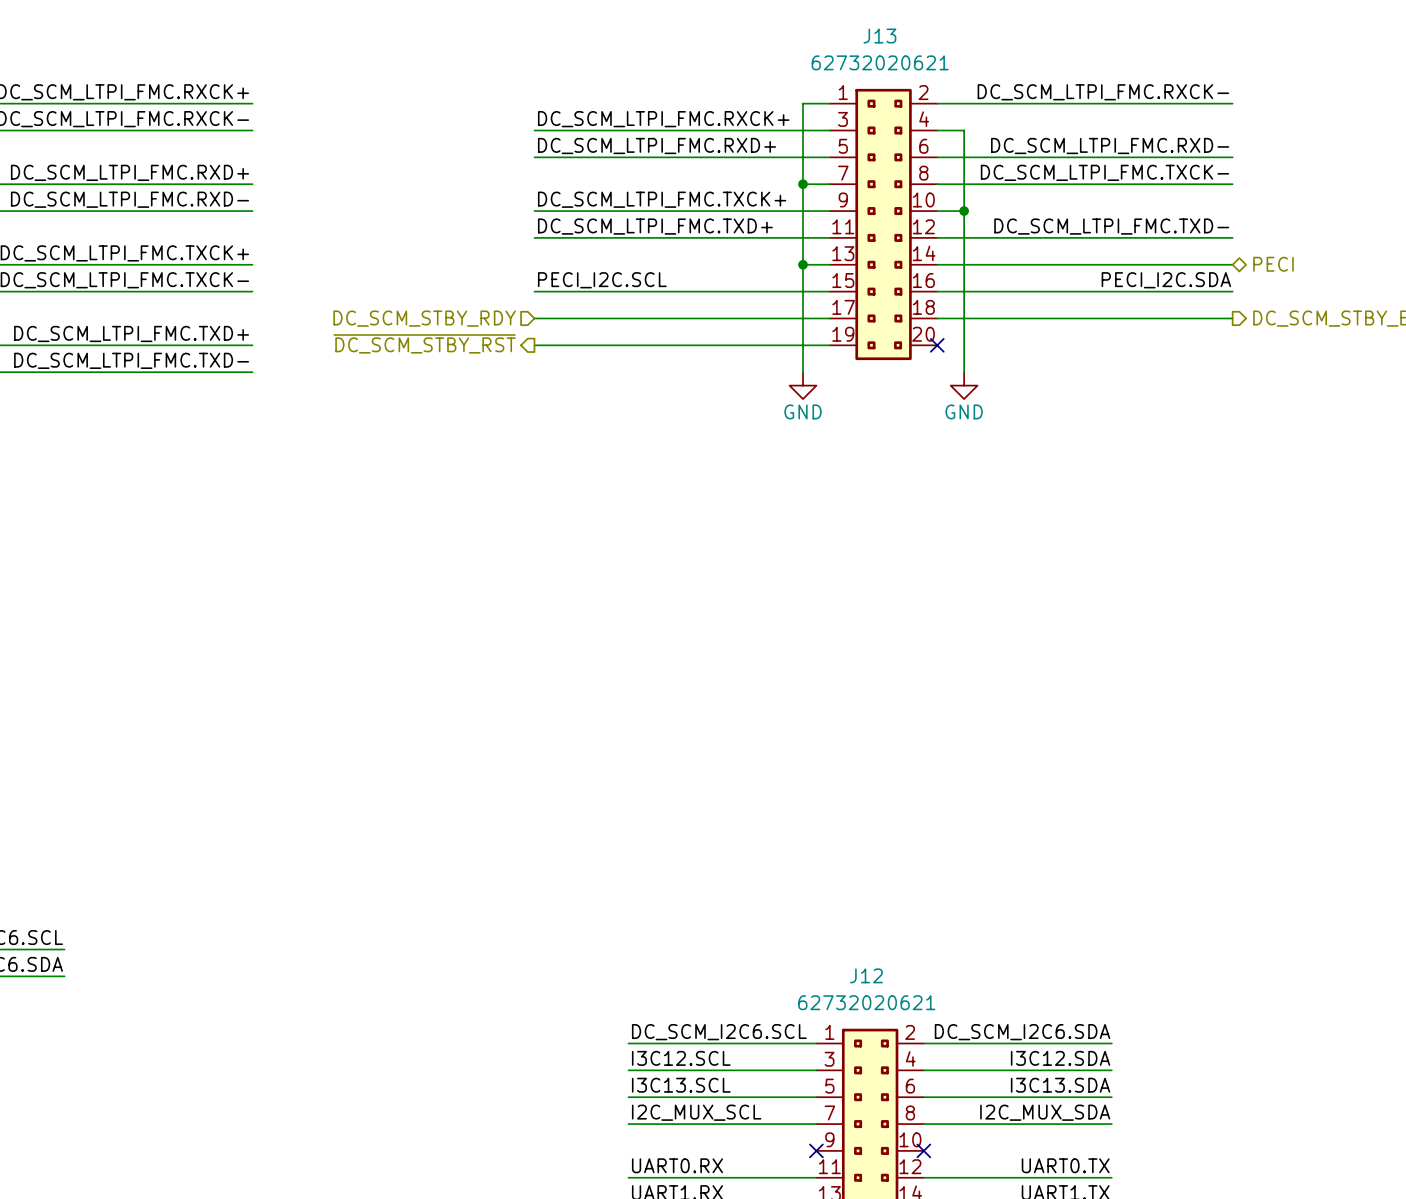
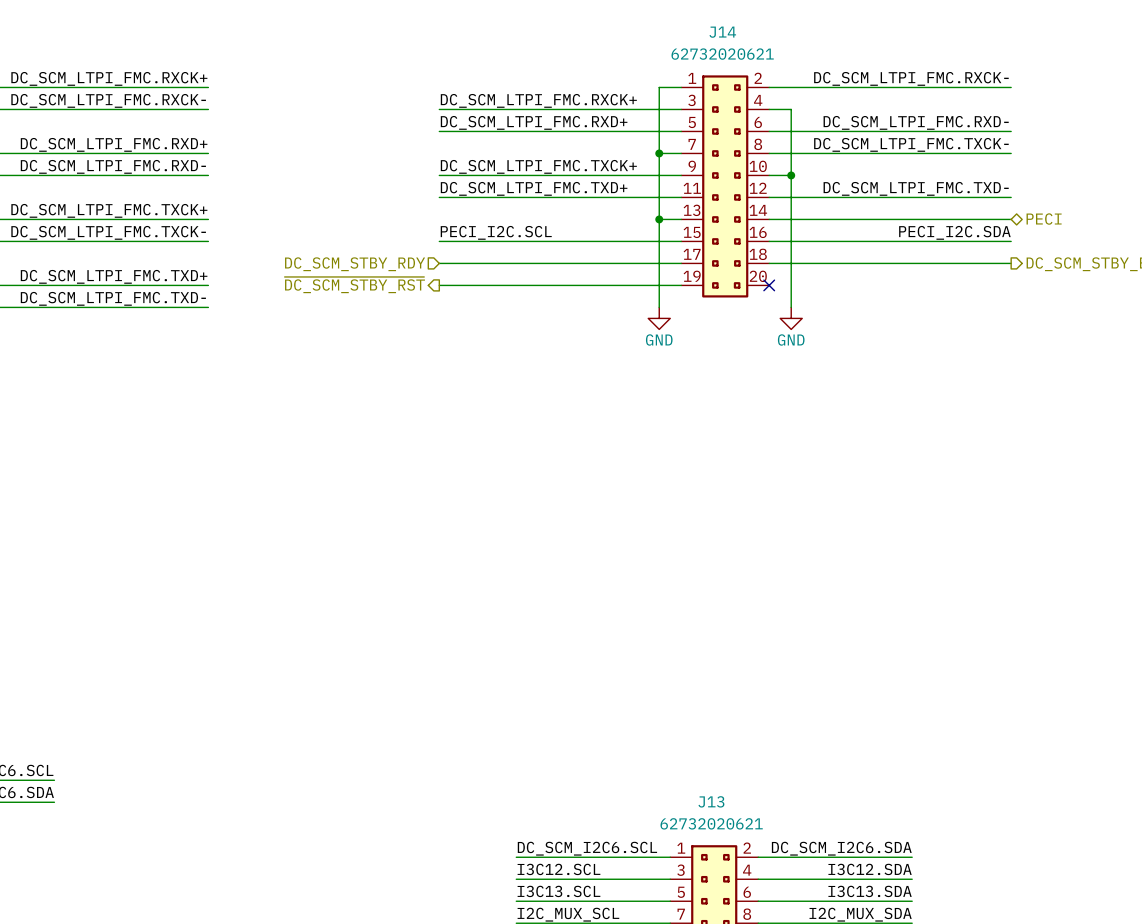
J13 name: J13 (879, 36) -> J14 (722, 32)
J12 name: J12 (866, 975) -> J13 (711, 801)

